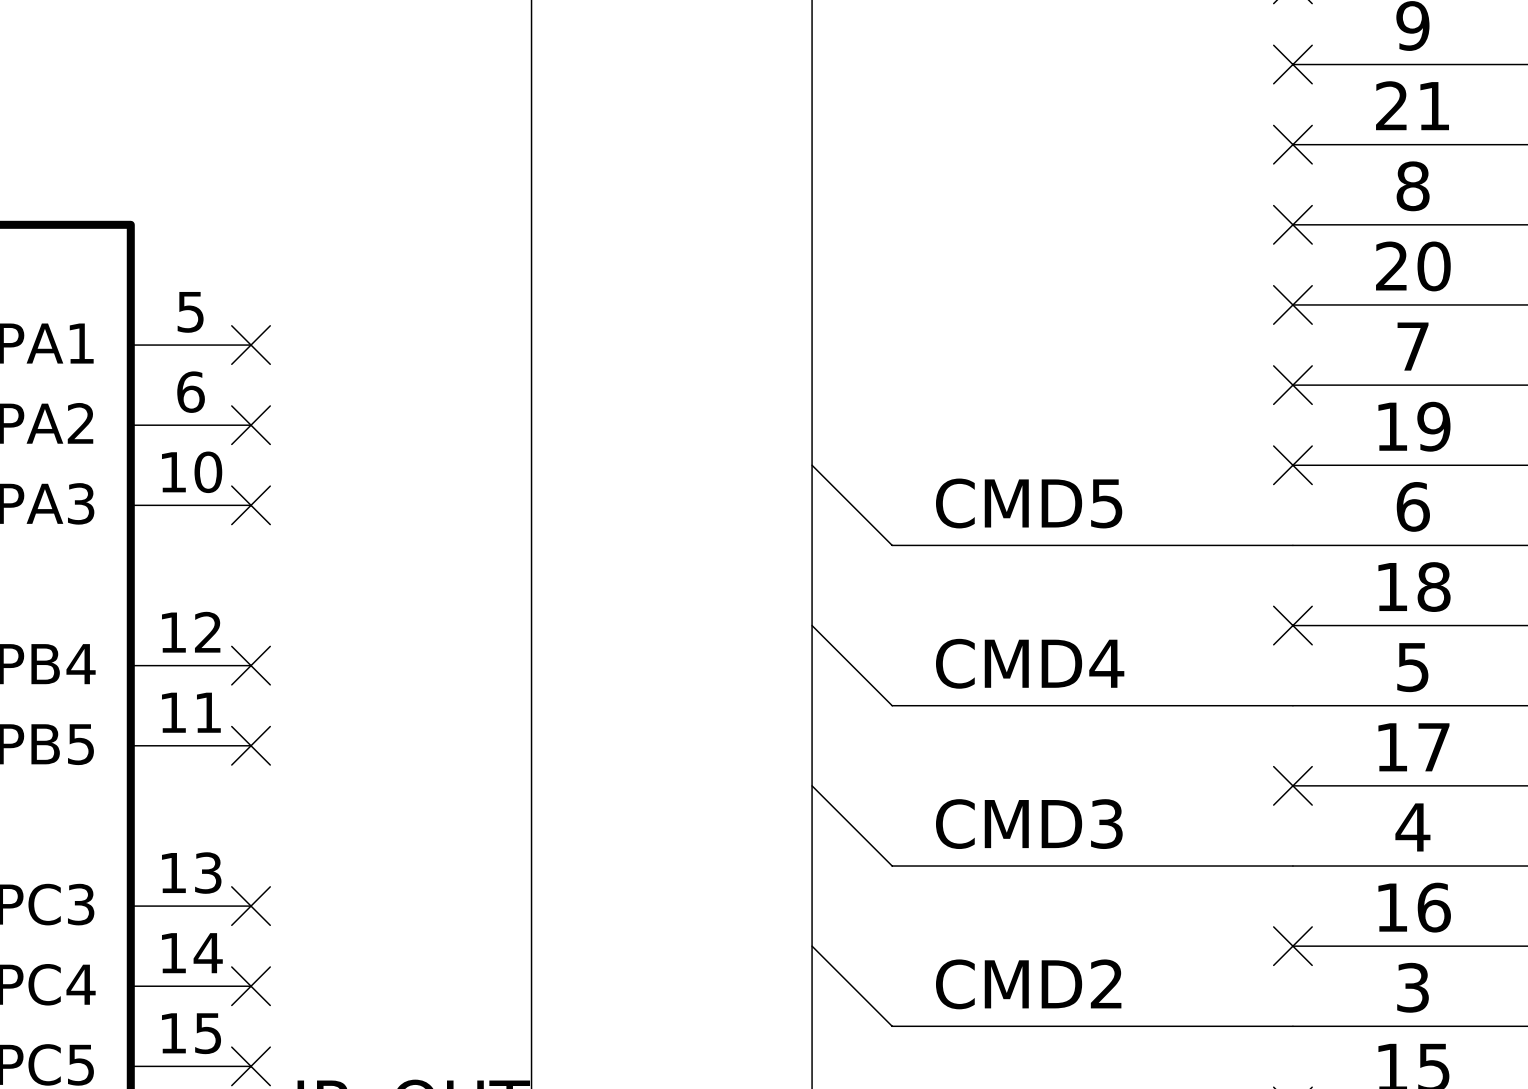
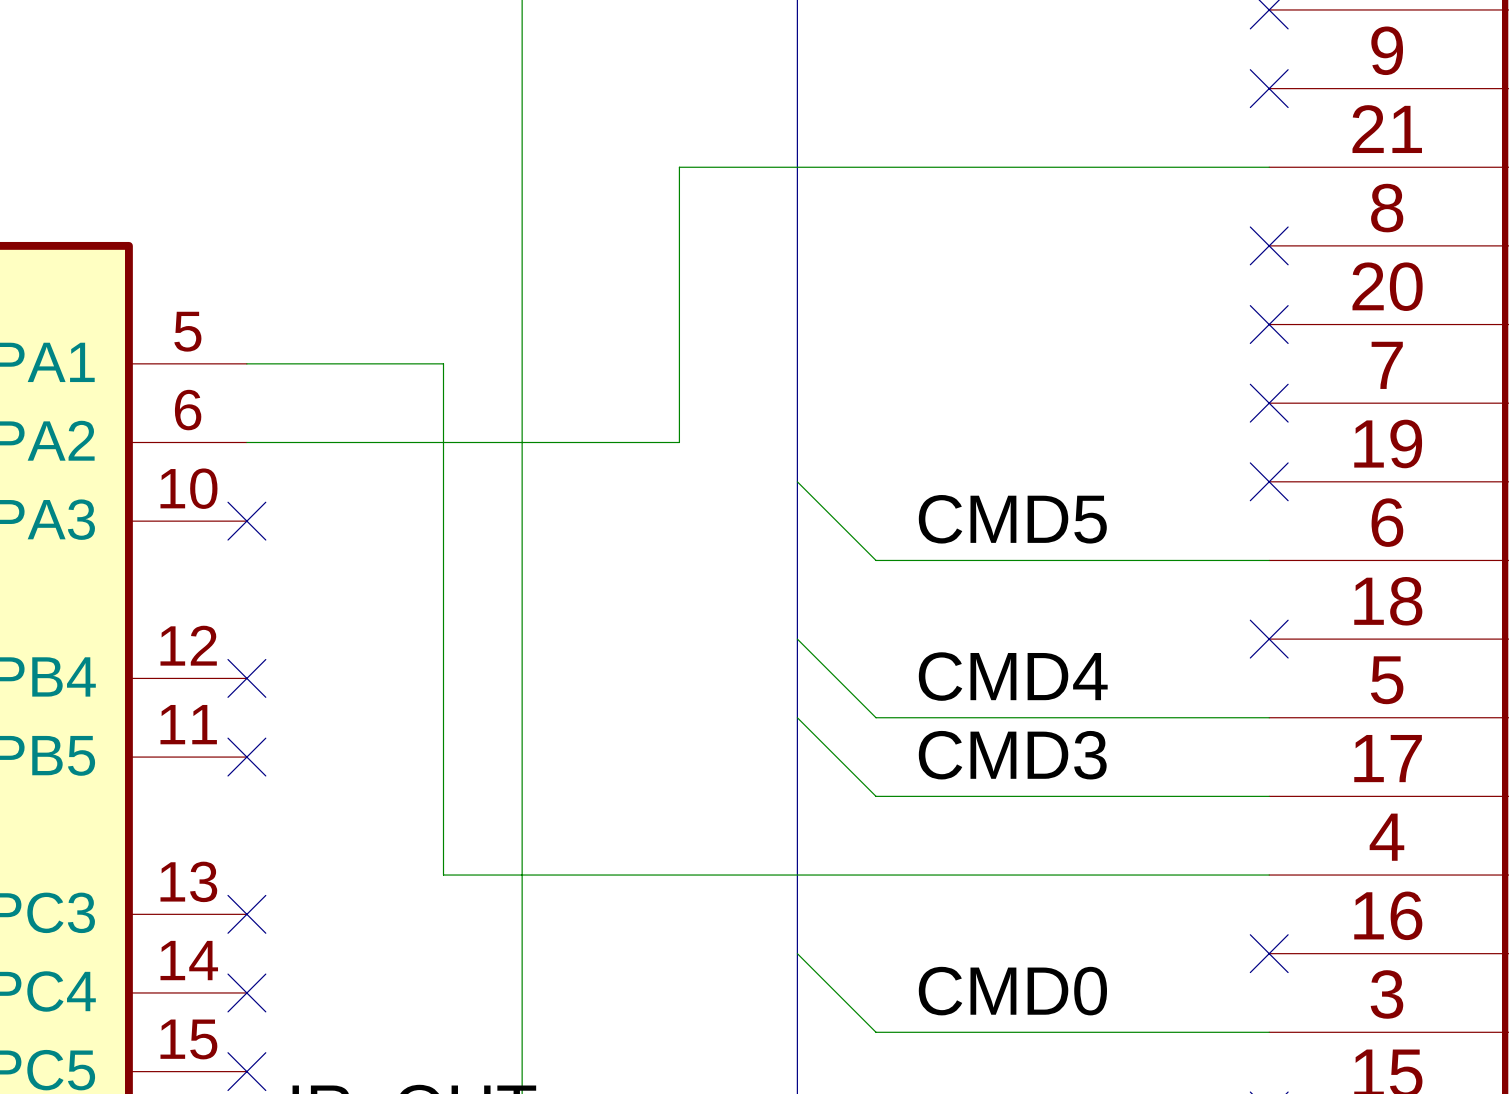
wire: none -> (1269, 167) (679, 167) (679, 442) (246, 442)
no-connect mark: (1292, 144) -> none
no-connect mark: (251, 345) -> none
no-connect mark: (251, 425) -> none
wire: none -> (797, 717) (876, 796) (1269, 796)
wire: (812, 785) (892, 866) -> (246, 363) (443, 363) (443, 875) (876, 875)
no-connect mark: (1292, 785) -> none
label position: CMD3 (1029, 824) -> CMD3 (1012, 755)
label: CMD2 (1028, 984) -> CMD0 (1012, 991)

